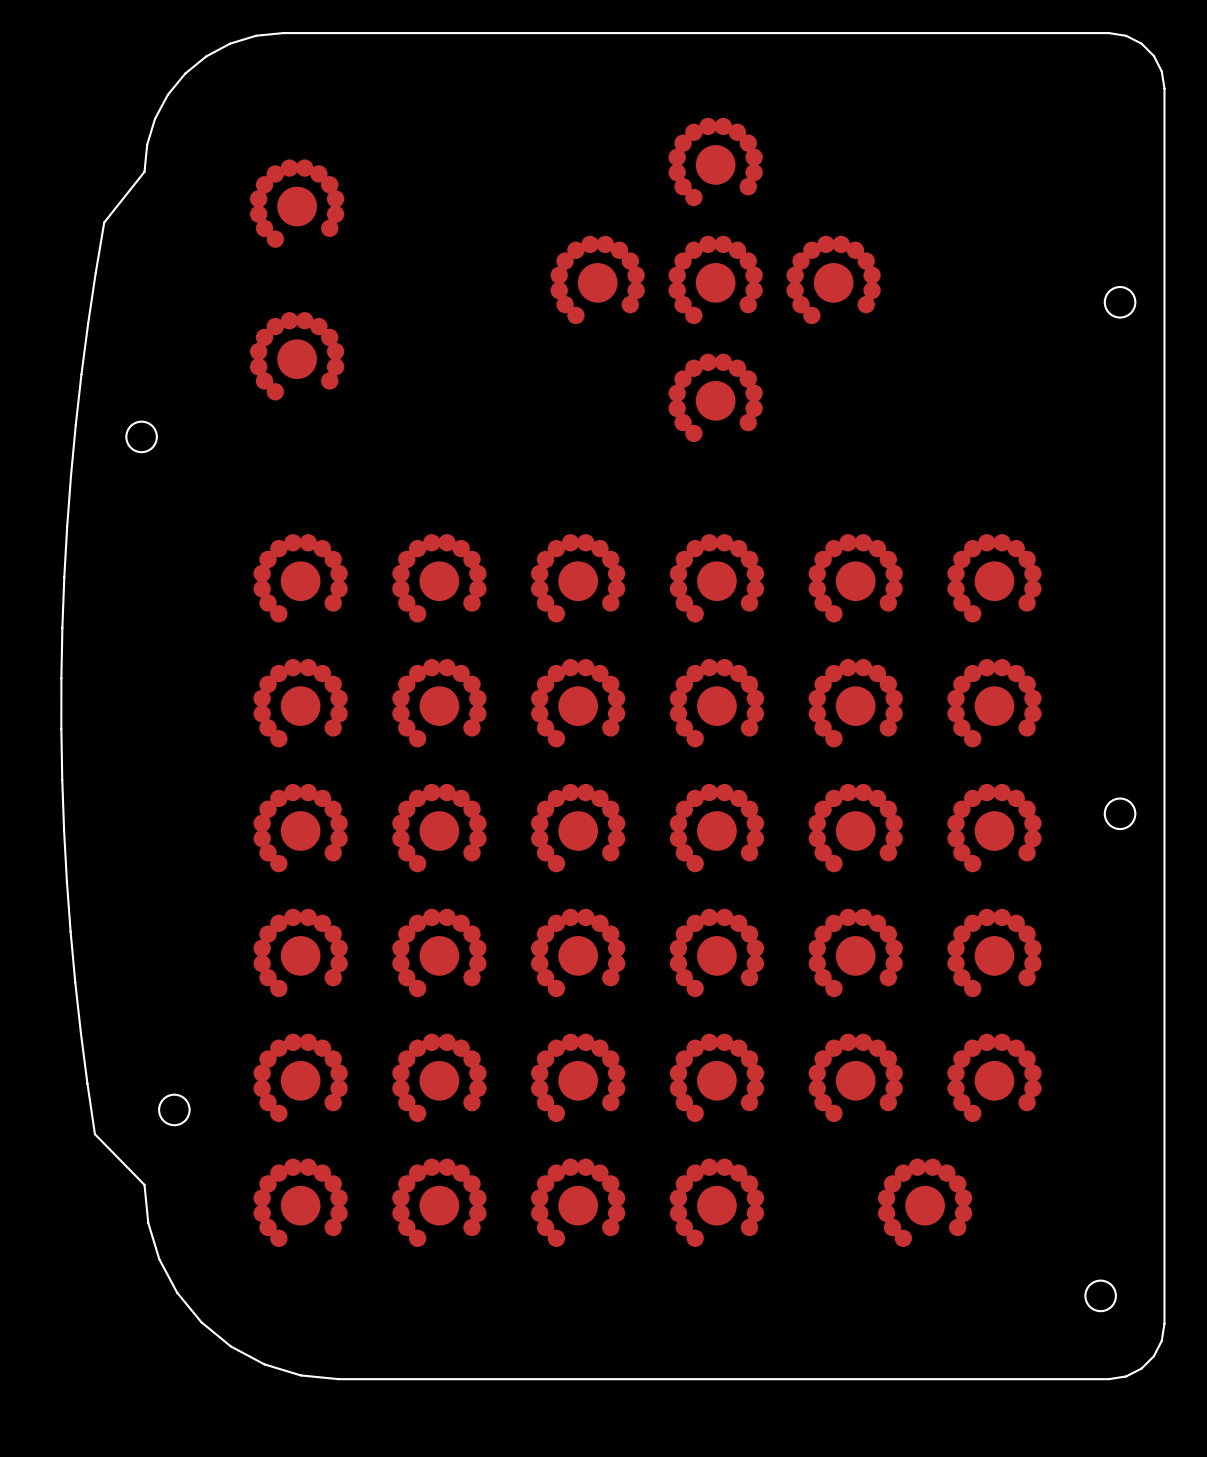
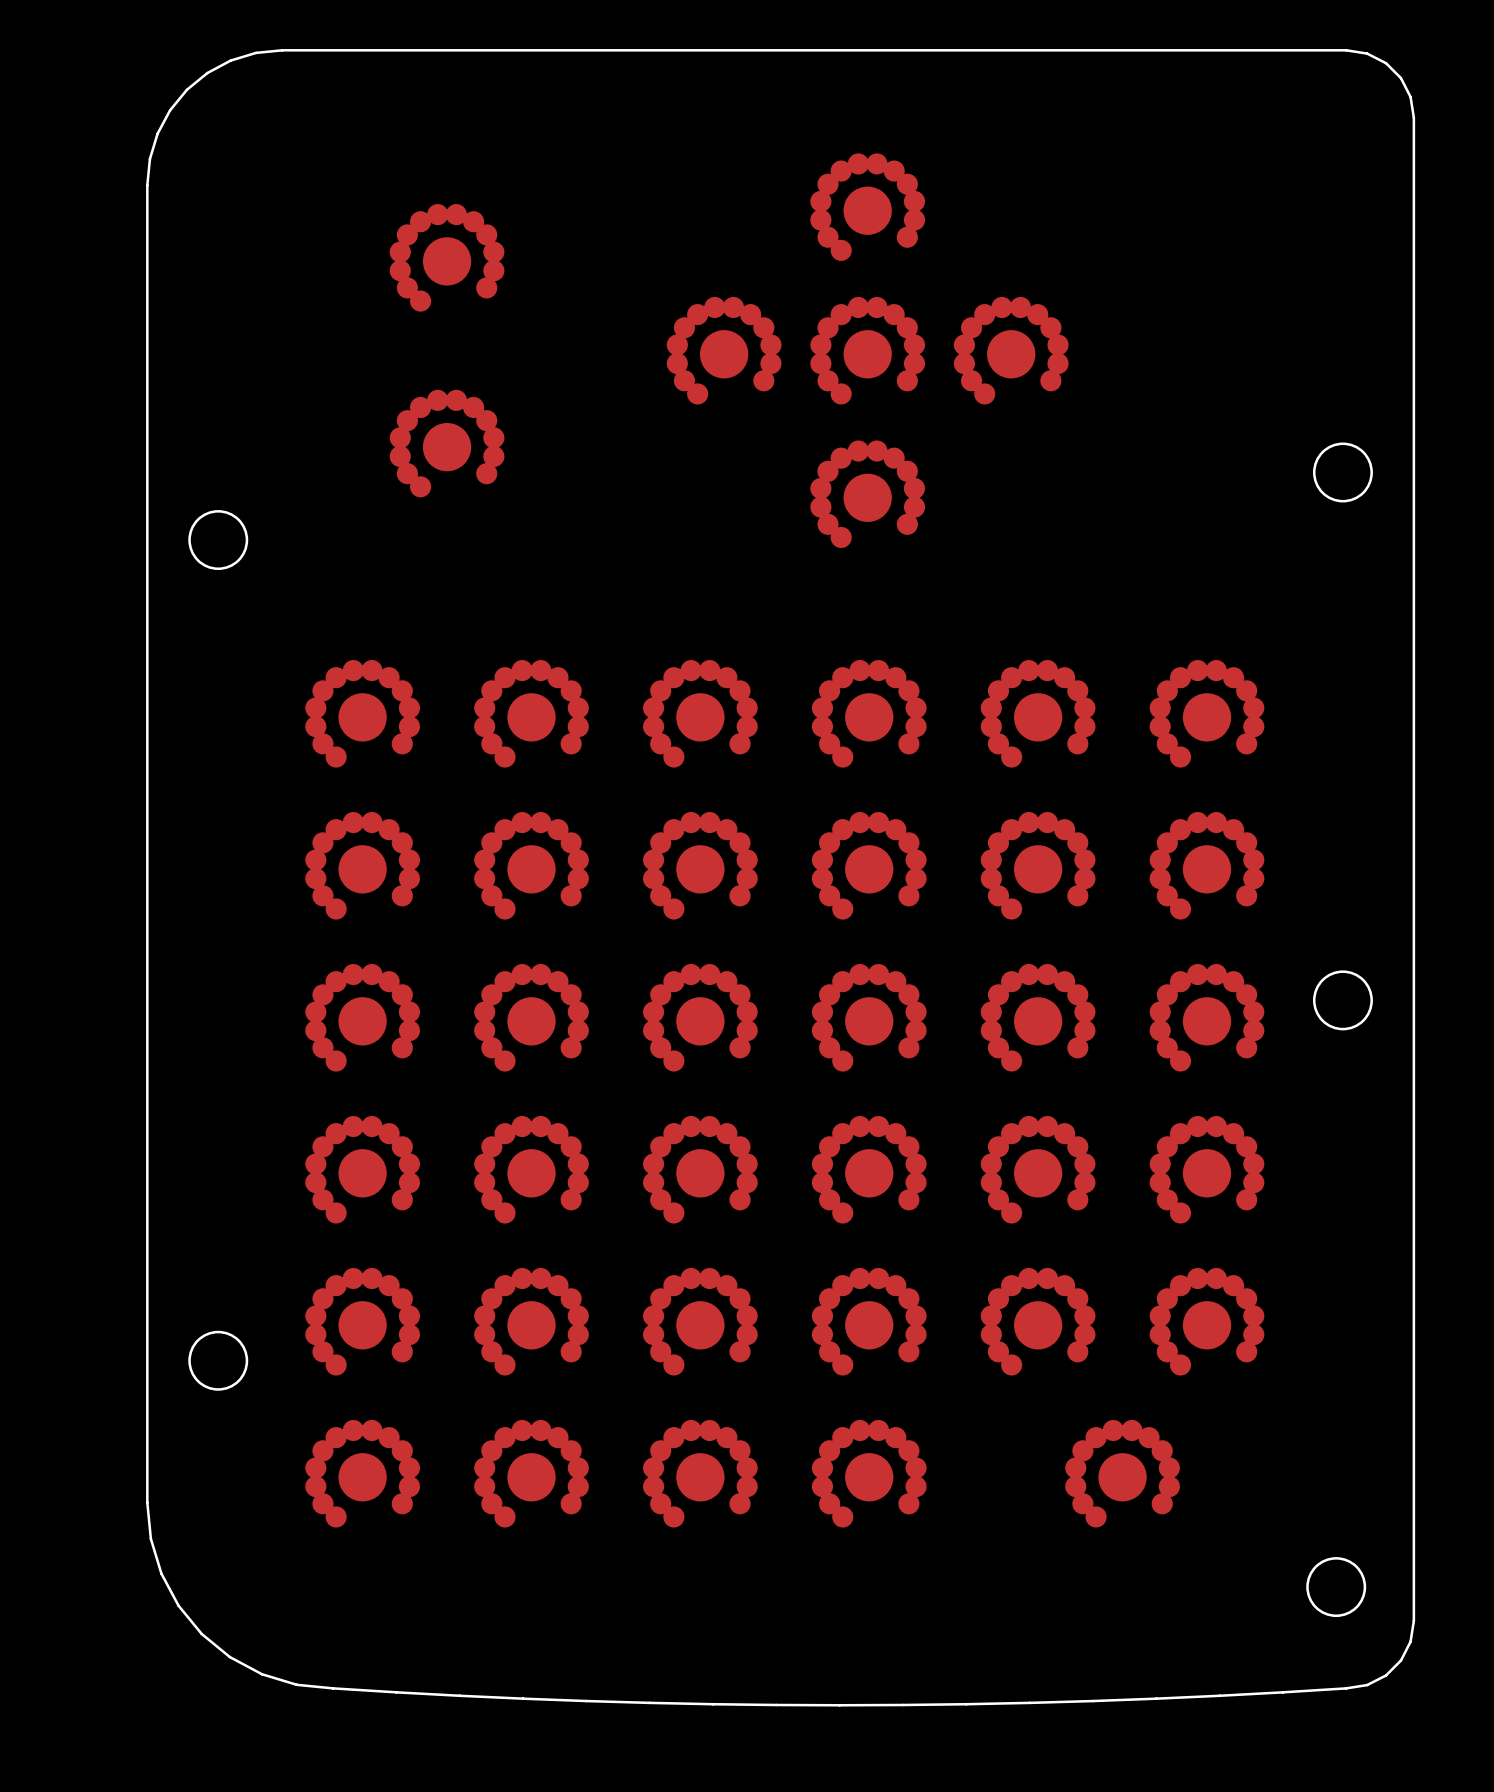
board edge: (283, 33) (256, 35) (230, 43) (206, 56) (185, 73) (167, 94) (155, 118) (147, 144) (144, 171) (104, 222) (81, 374) (71, 475) (62, 627) (62, 779) (70, 931) (87, 1083) (94, 1134) (144, 1184) (148, 1222) (159, 1259) (177, 1292) (201, 1322) (230, 1346) (264, 1364) (300, 1375) (338, 1379) (1108, 1379) -> (341, 50) (282, 50) (256, 52) (230, 60) (207, 73) (186, 89) (170, 110) (157, 133) (149, 159) (147, 185) (147, 1502) (150, 1538) (161, 1573) (178, 1605) (201, 1633) (229, 1657) (261, 1674) (296, 1684) (333, 1688) (586, 1701) (839, 1705) (1093, 1701) (1346, 1688)
part position: (297, 203) -> (447, 257)
round board edge: [1103, 285, 1137, 319] -> none
round board edge: none -> [1312, 442, 1373, 503]
part position: (297, 356) -> (447, 443)
round board edge: none -> [188, 510, 249, 571]
round board edge: [125, 420, 158, 454] -> none
round board edge size: [1103, 797, 1137, 831] -> [1312, 970, 1373, 1031]
round board edge size: [158, 1093, 191, 1127] -> [188, 1330, 249, 1391]
round board edge size: [1084, 1279, 1117, 1313] -> [1306, 1557, 1367, 1618]

